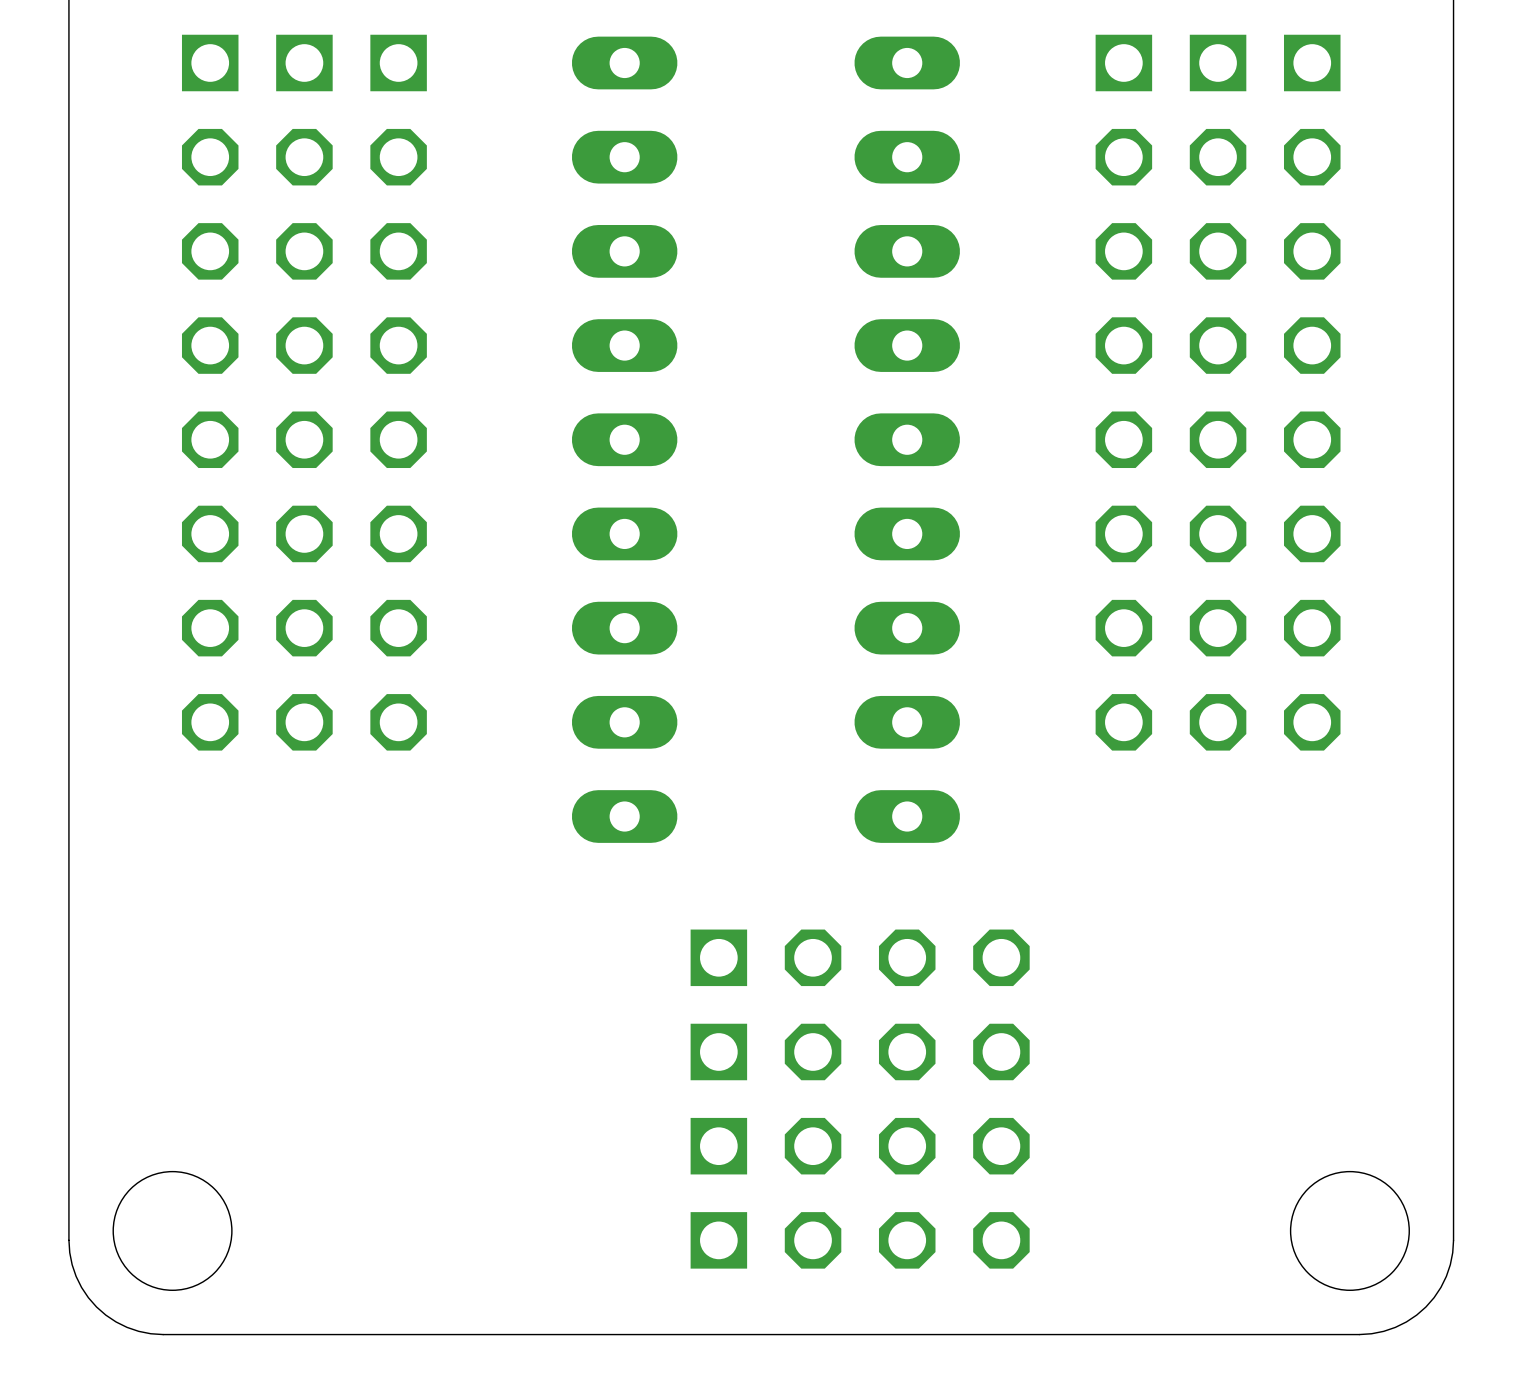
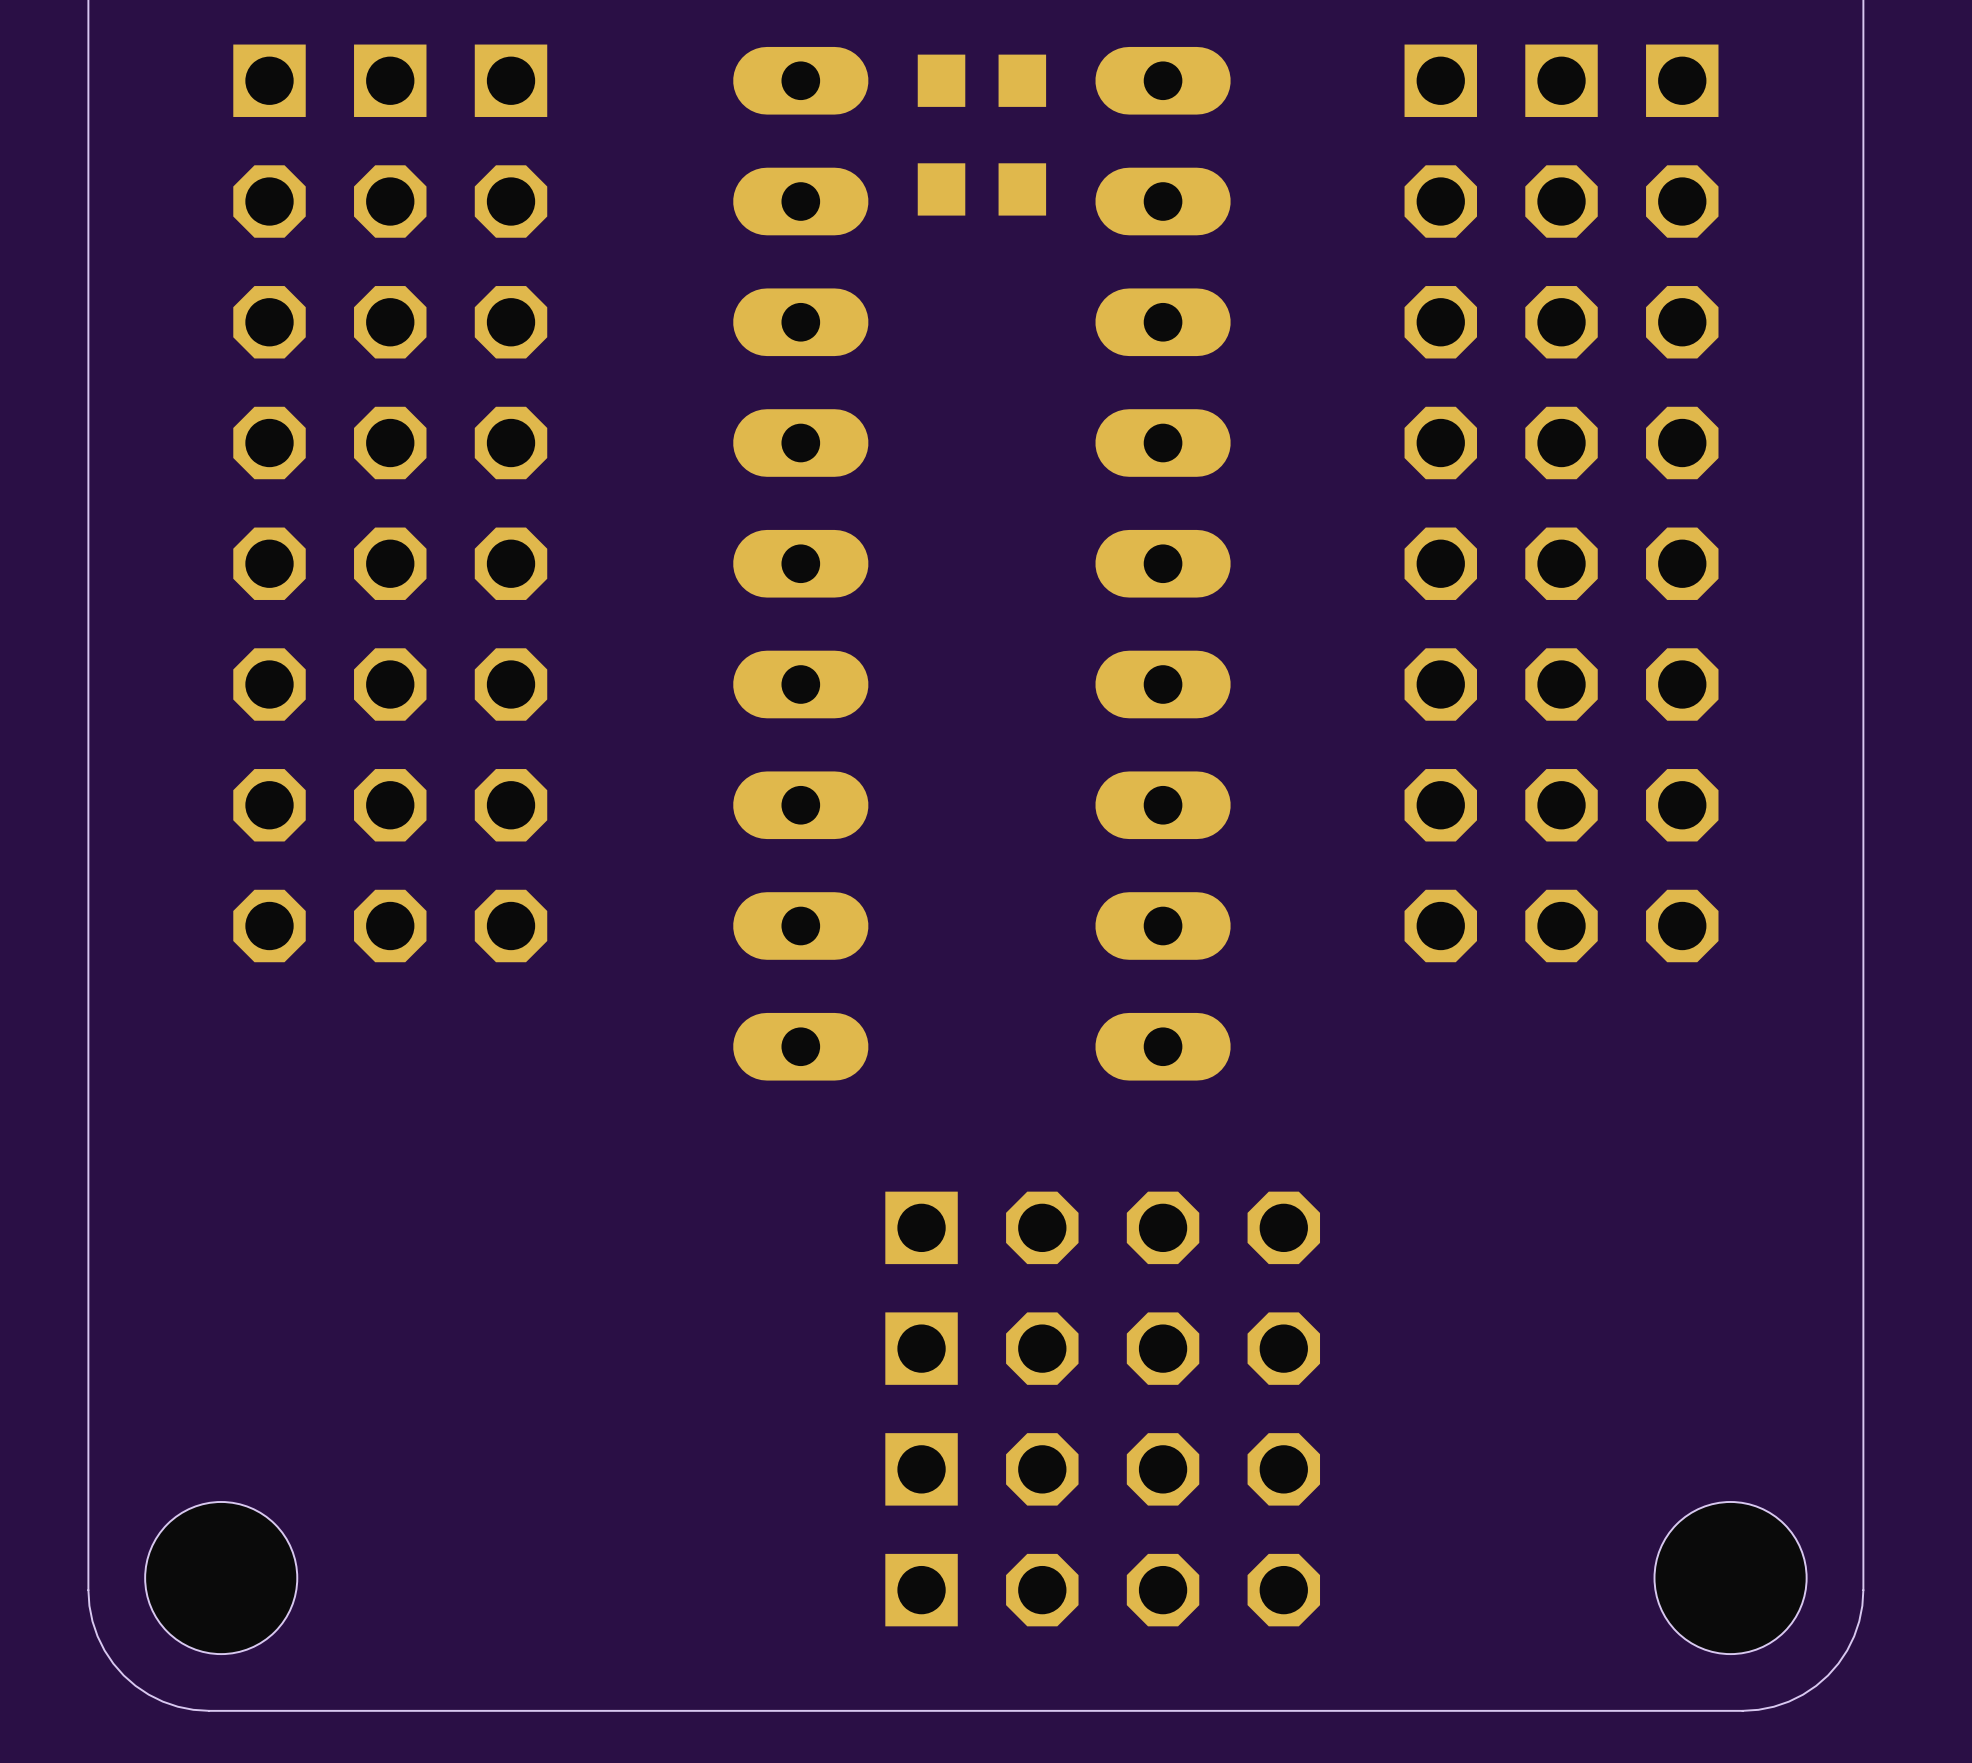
part: none -> (981, 80)
part: none -> (981, 189)

